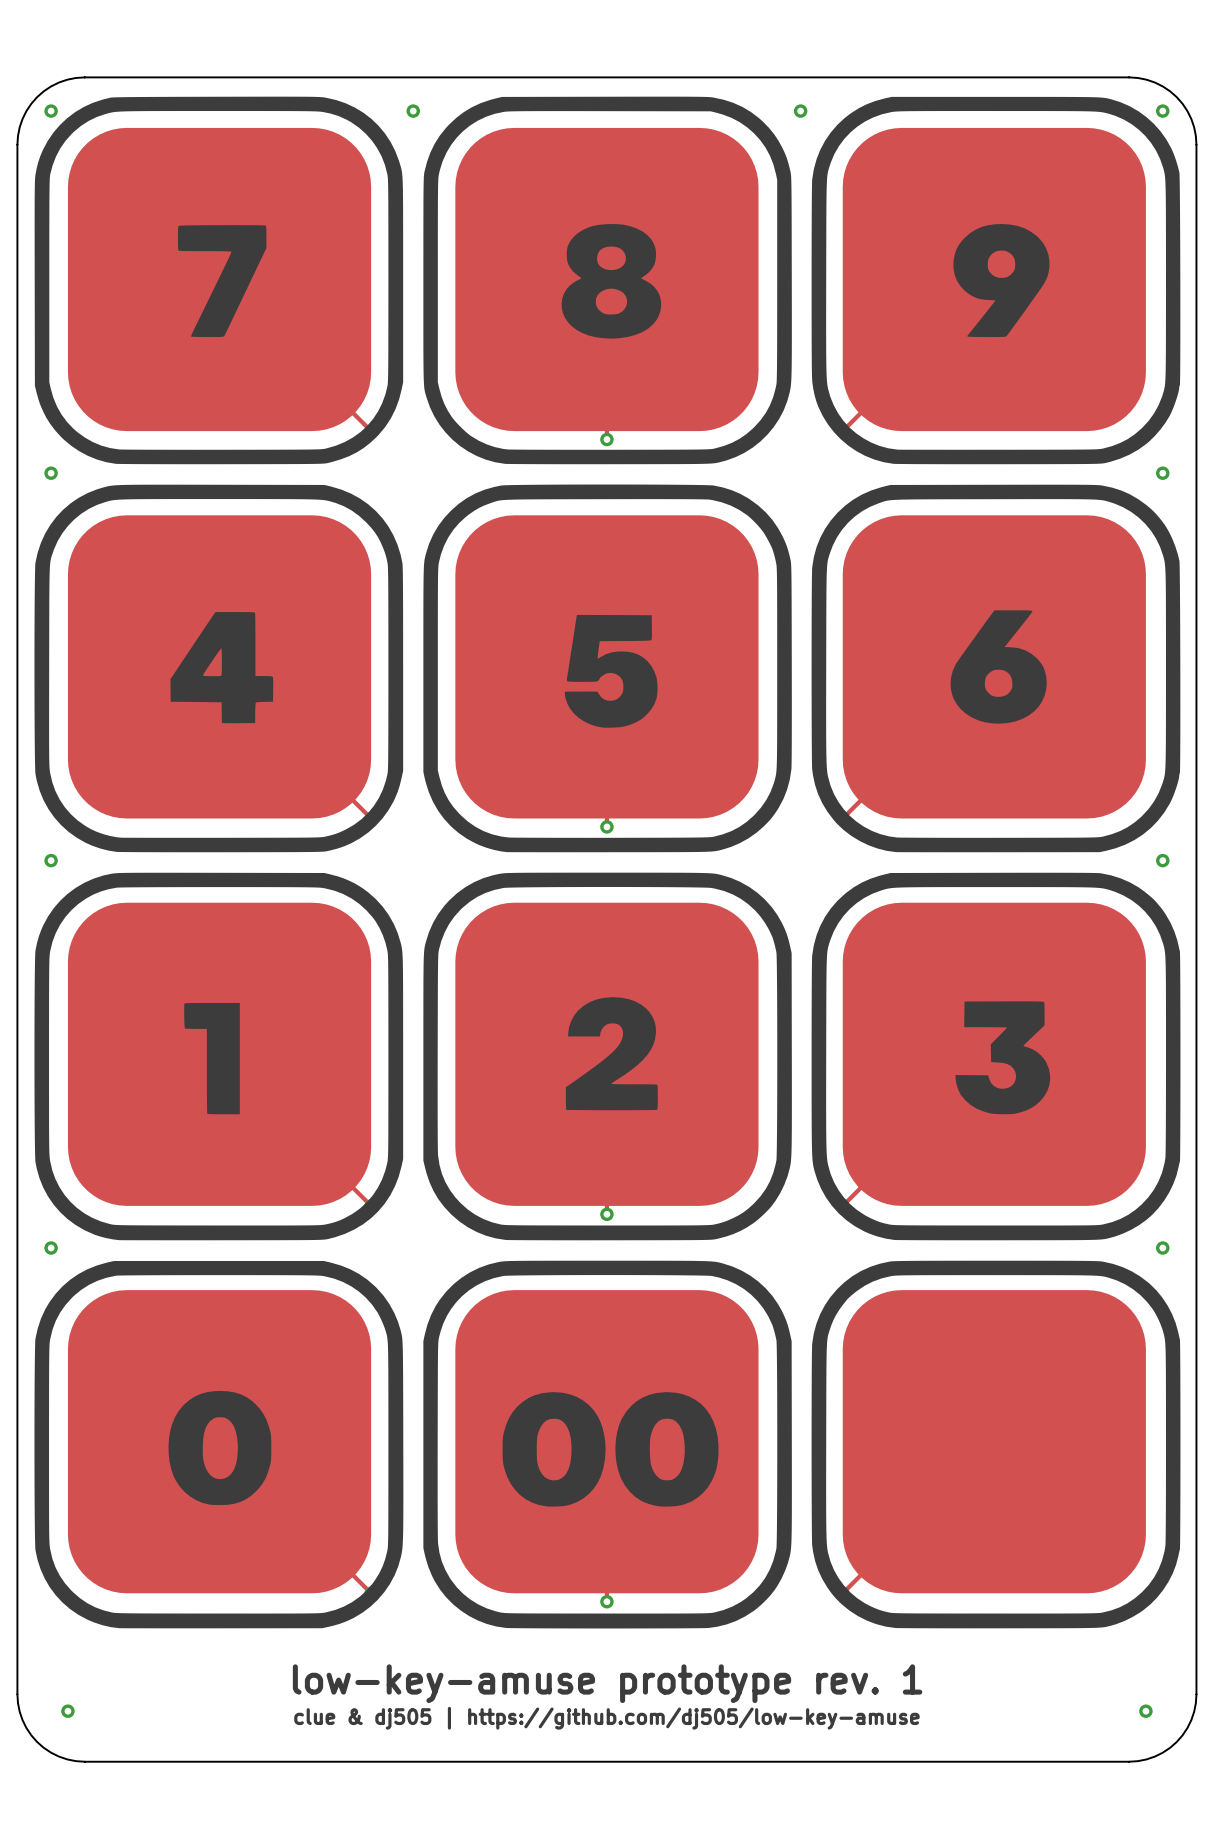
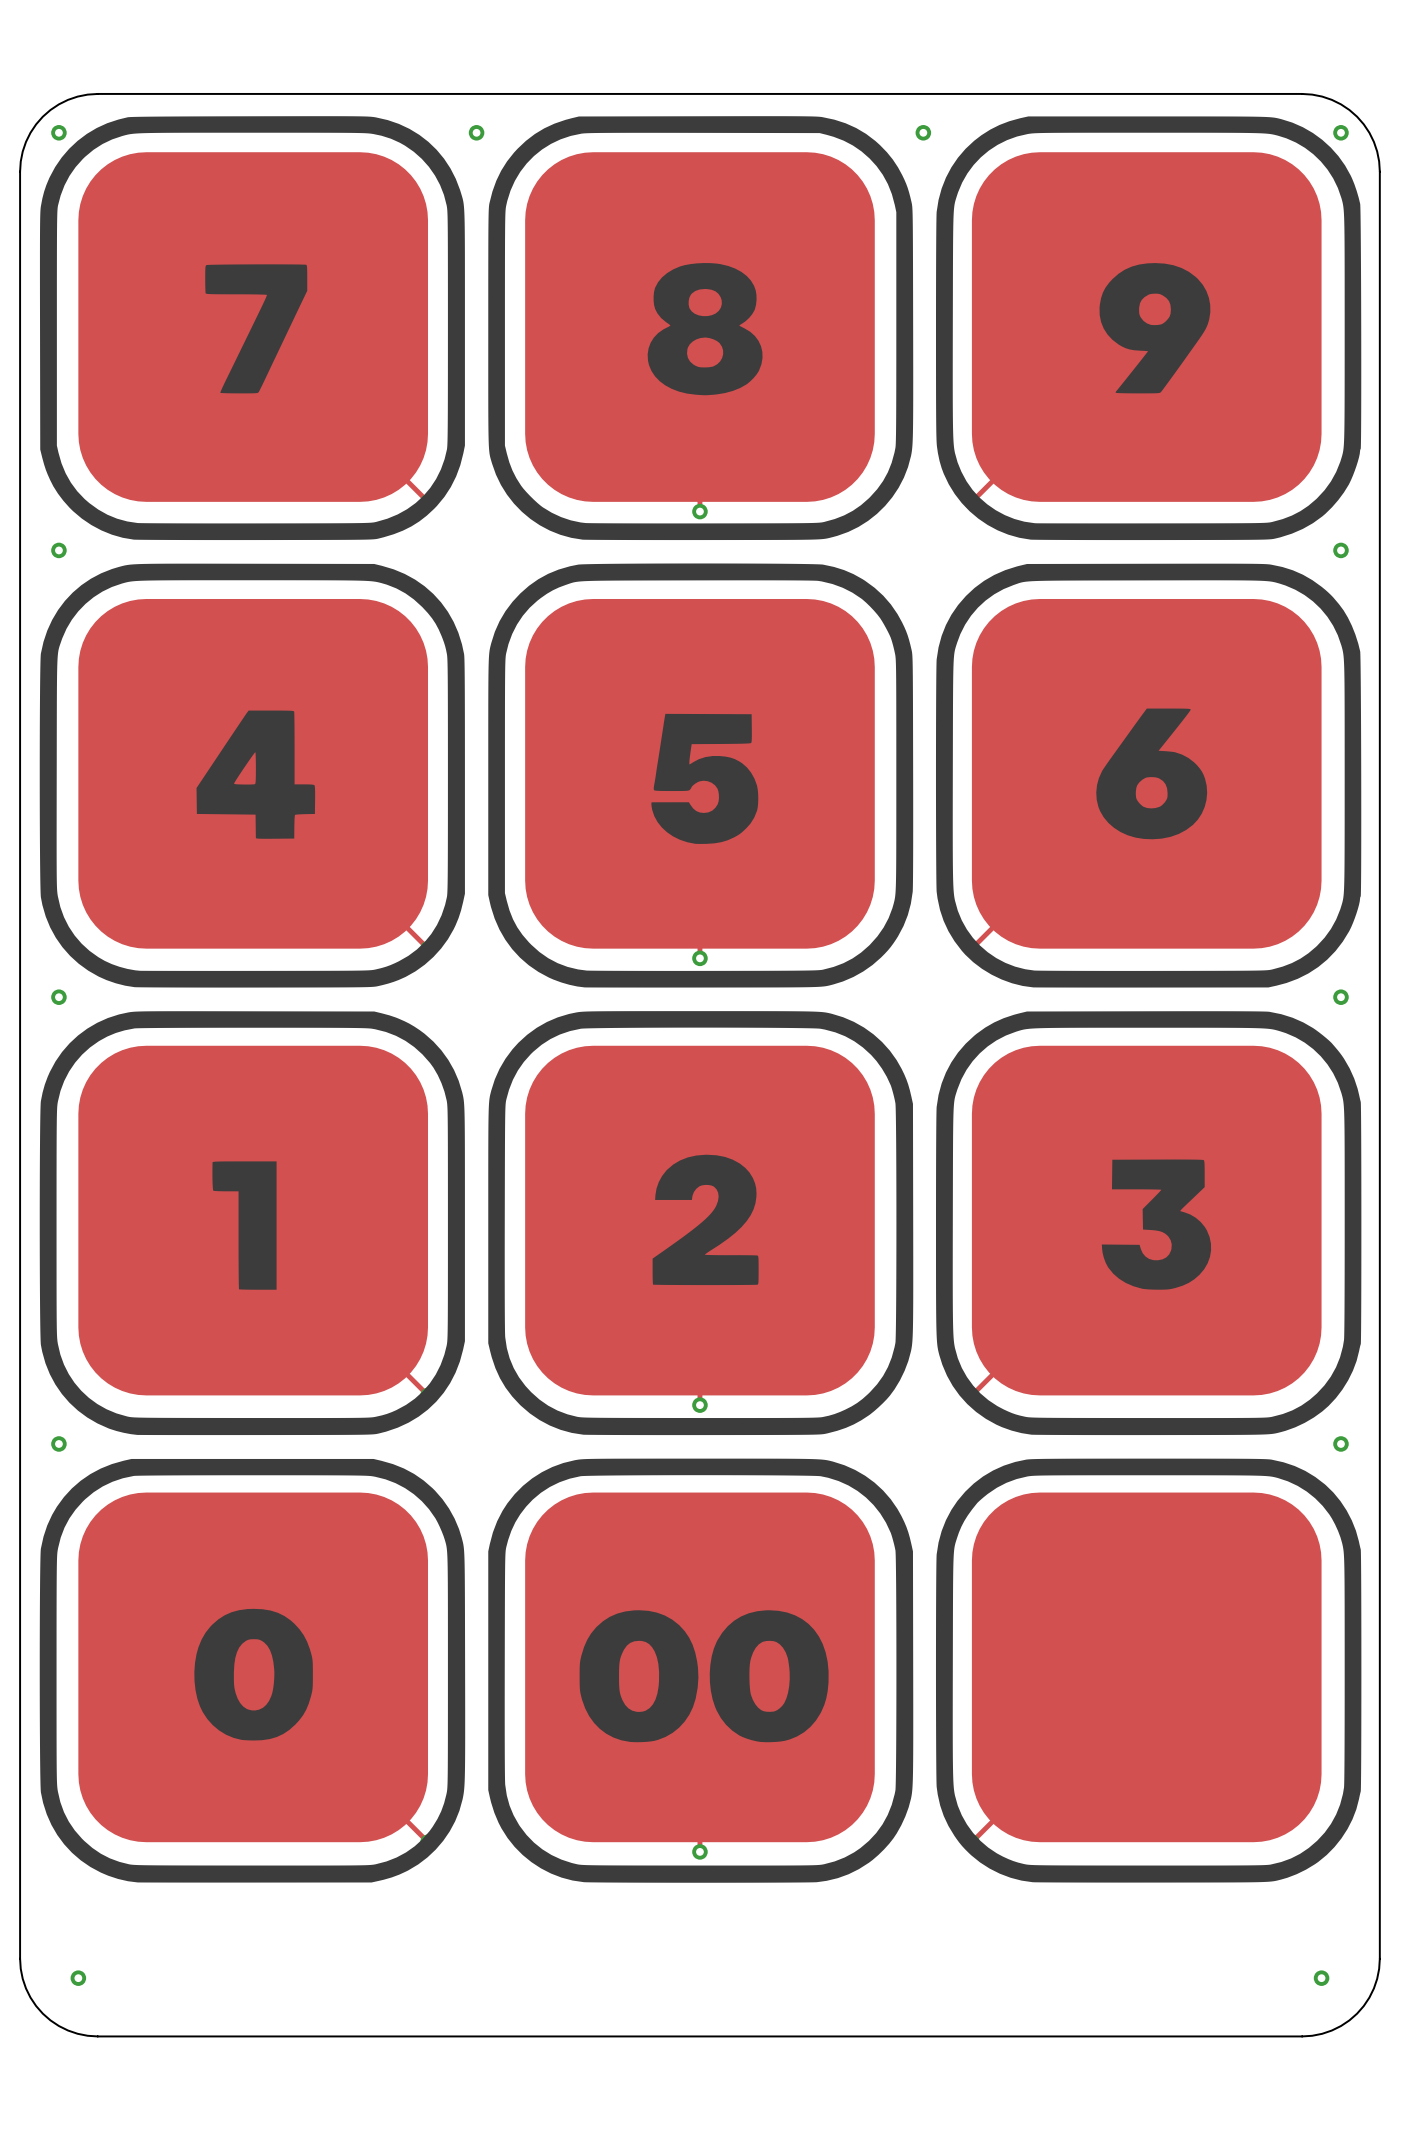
text: low-key-amuse prototype rev. 1 (607, 1683) -> none
text: clue & dj505 | https://github.com/dj505/low-key-amuse (606, 1718) -> none

